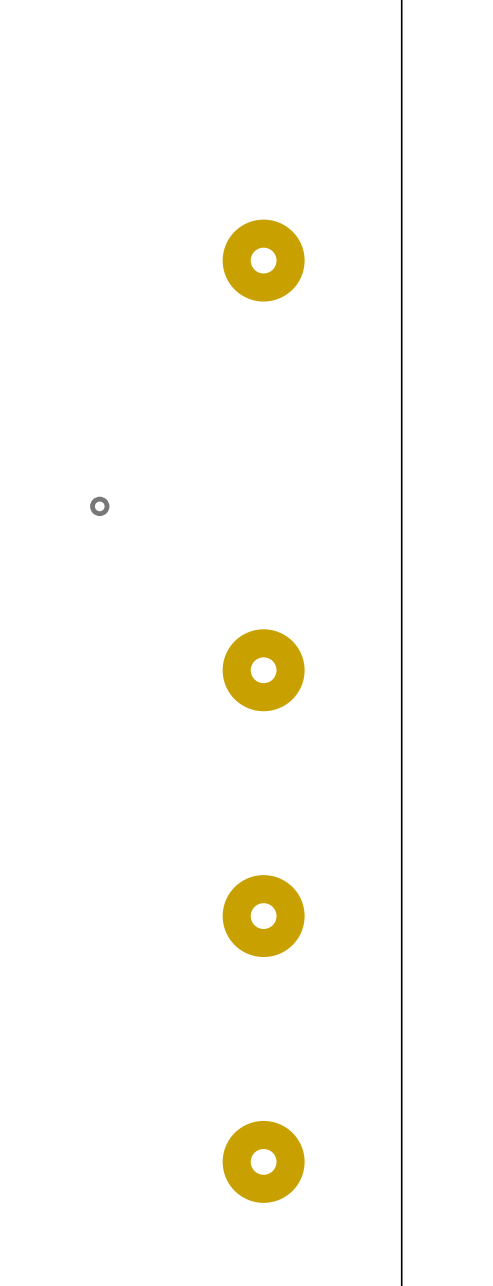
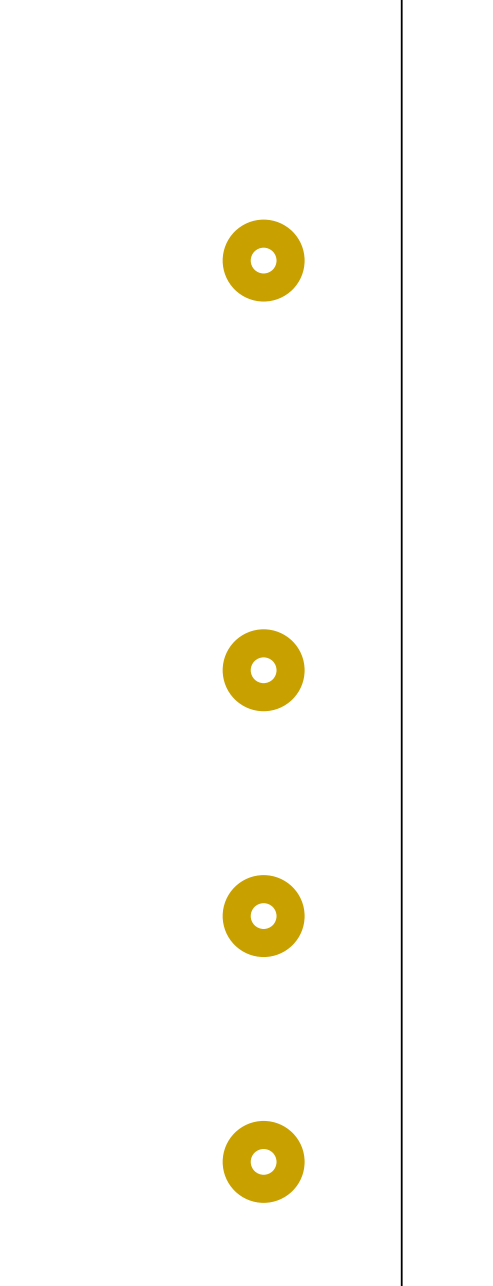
via: (99, 506) -> none

